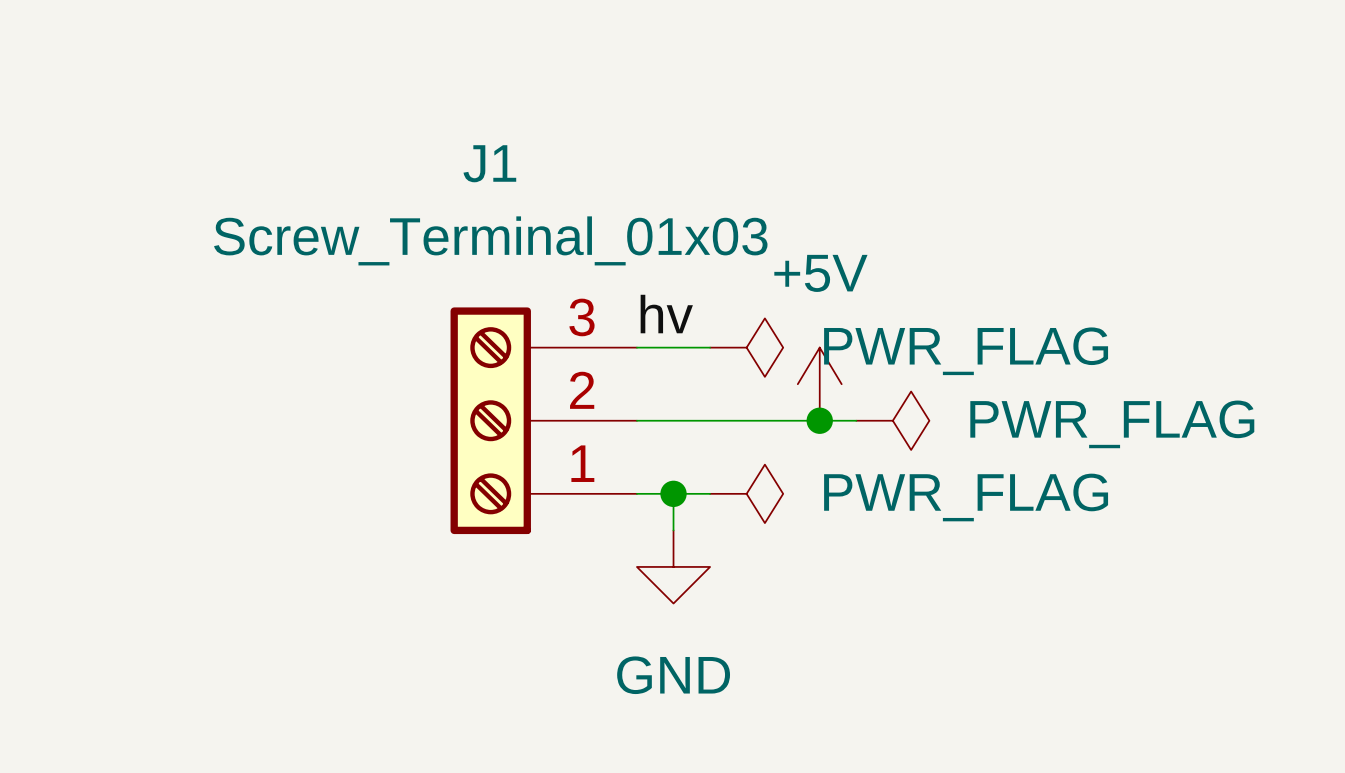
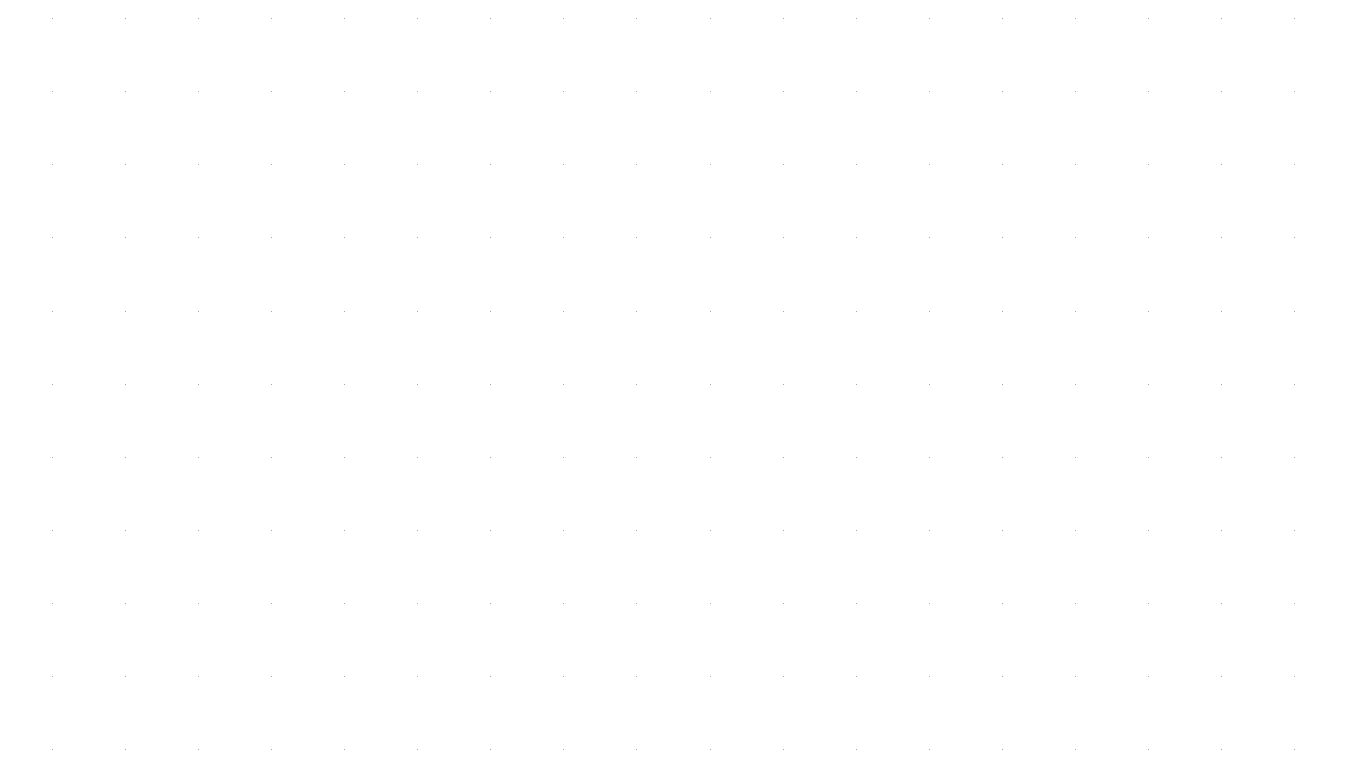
label: hv (666, 314) -> none
wire: (636, 347) (710, 347) -> none
power symbol: PWR_FLAG (746, 347) -> none
power symbol: +5V (819, 384) -> none
J1: Screw_Terminal_01x03 (543, 420) -> none
wire: (636, 420) (856, 420) -> none
junction: (819, 420) -> none
power symbol: PWR_FLAG (892, 420) -> none
wire: (636, 493) (710, 493) -> none
wire: (673, 493) (673, 530) -> none
junction: (673, 493) -> none
power symbol: PWR_FLAG (746, 493) -> none
power symbol: GND (673, 566) -> none

